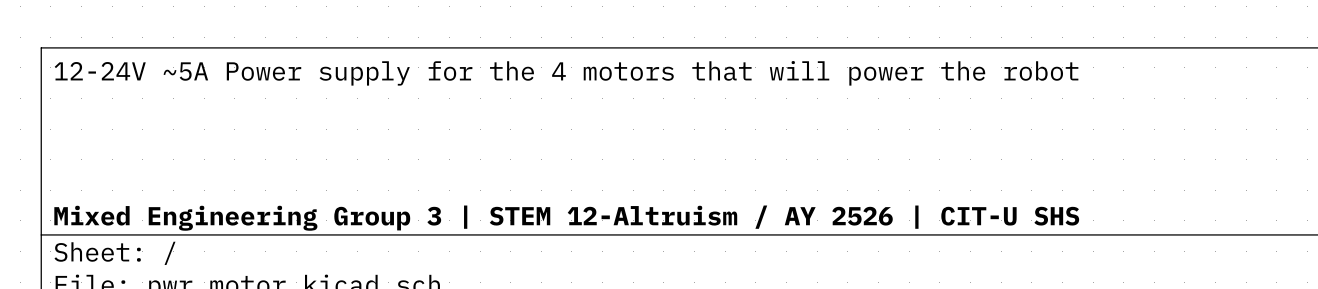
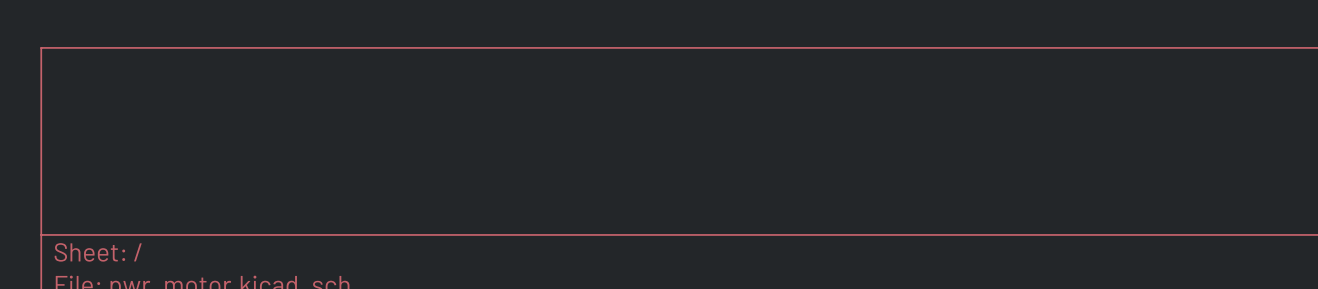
title block: 12-24V ~5A Power supply for the 4 motors that will power the robot (566, 73) -> none
title block: Mixed Engineering Group 3 | STEM 12-Altruism / AY 2526 | CIT-U SHS (566, 218) -> none

